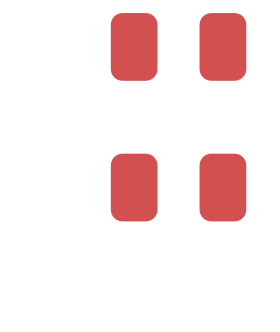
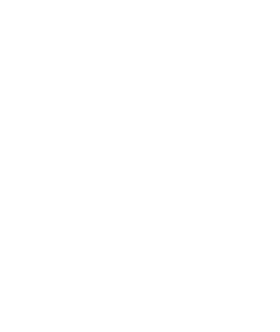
part: (178, 46) -> none
part: (178, 187) -> none

